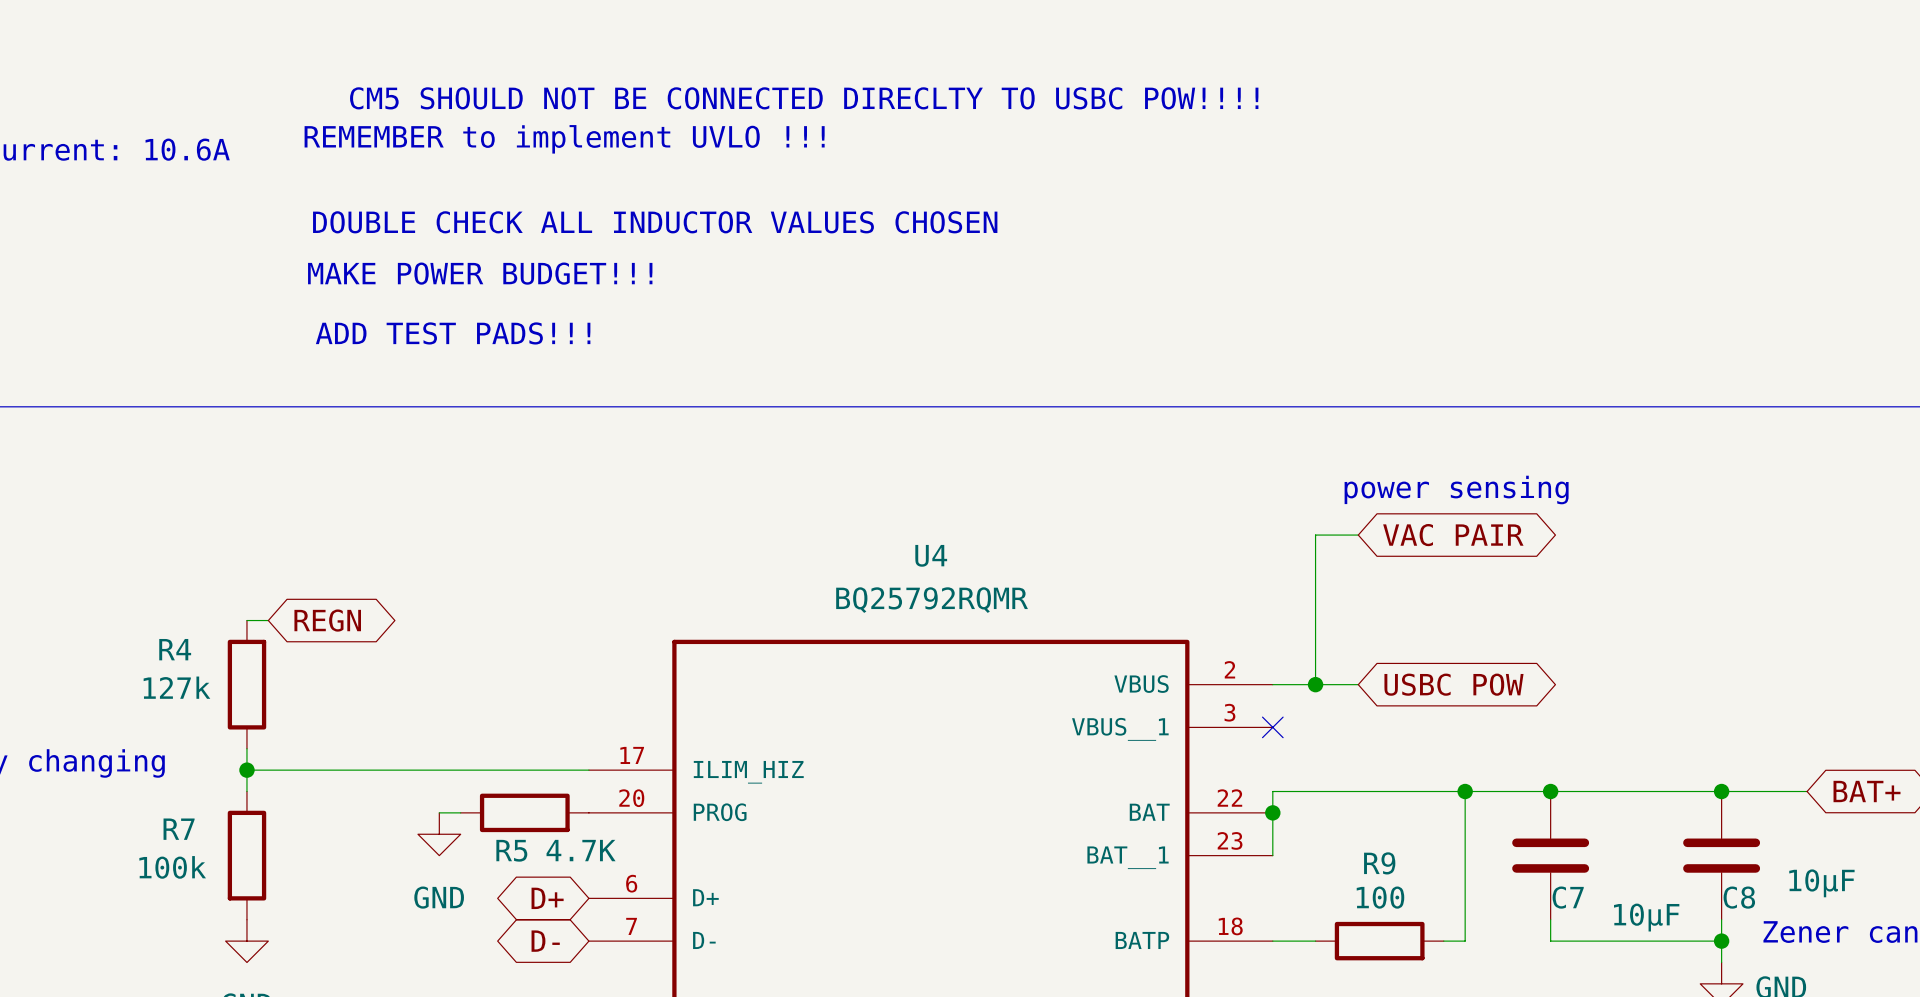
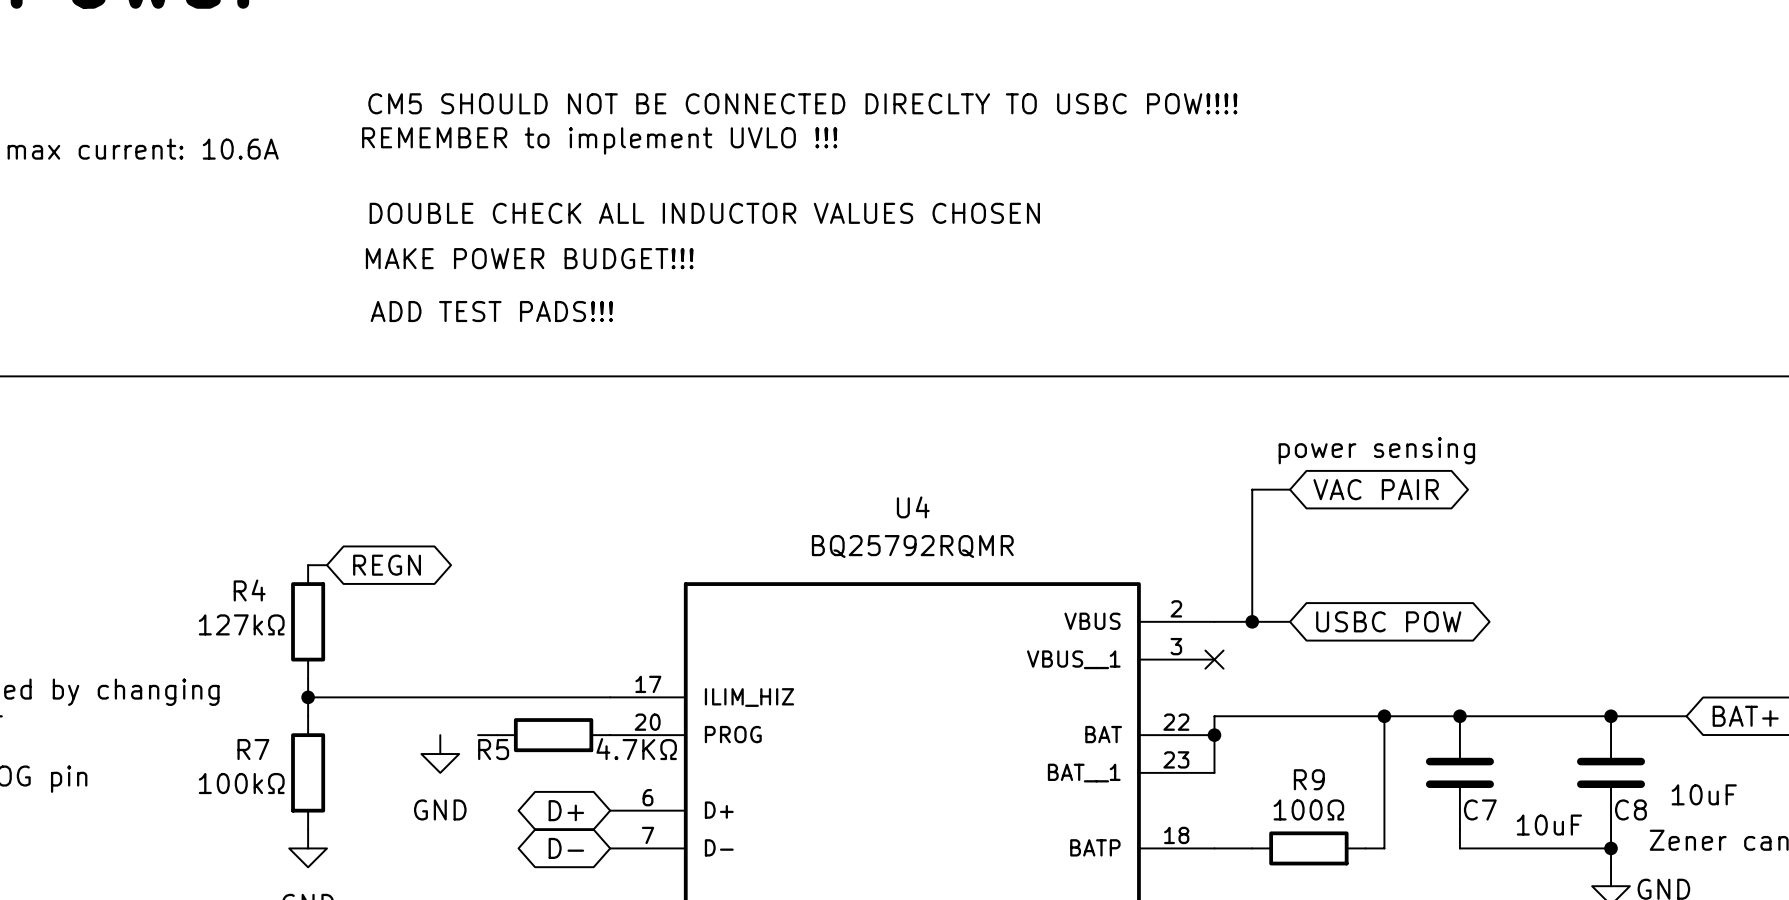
R4 value: 127k (176, 687) -> 127kΩ (241, 624)
power symbol position: GND (439, 834) -> GND (440, 754)
R5 name position: R5 (511, 850) -> R5 (493, 749)
R5 value: 4.7K (581, 850) -> 4.7KΩ (636, 749)
R7 value: 100k (172, 867) -> 100kΩ (241, 783)
C8 value: 10μF (1821, 883) -> 10uF (1704, 794)
R9 value: 100 (1380, 897) -> 100Ω (1308, 809)
C7 value: 10μF (1646, 917) -> 10uF (1549, 825)

